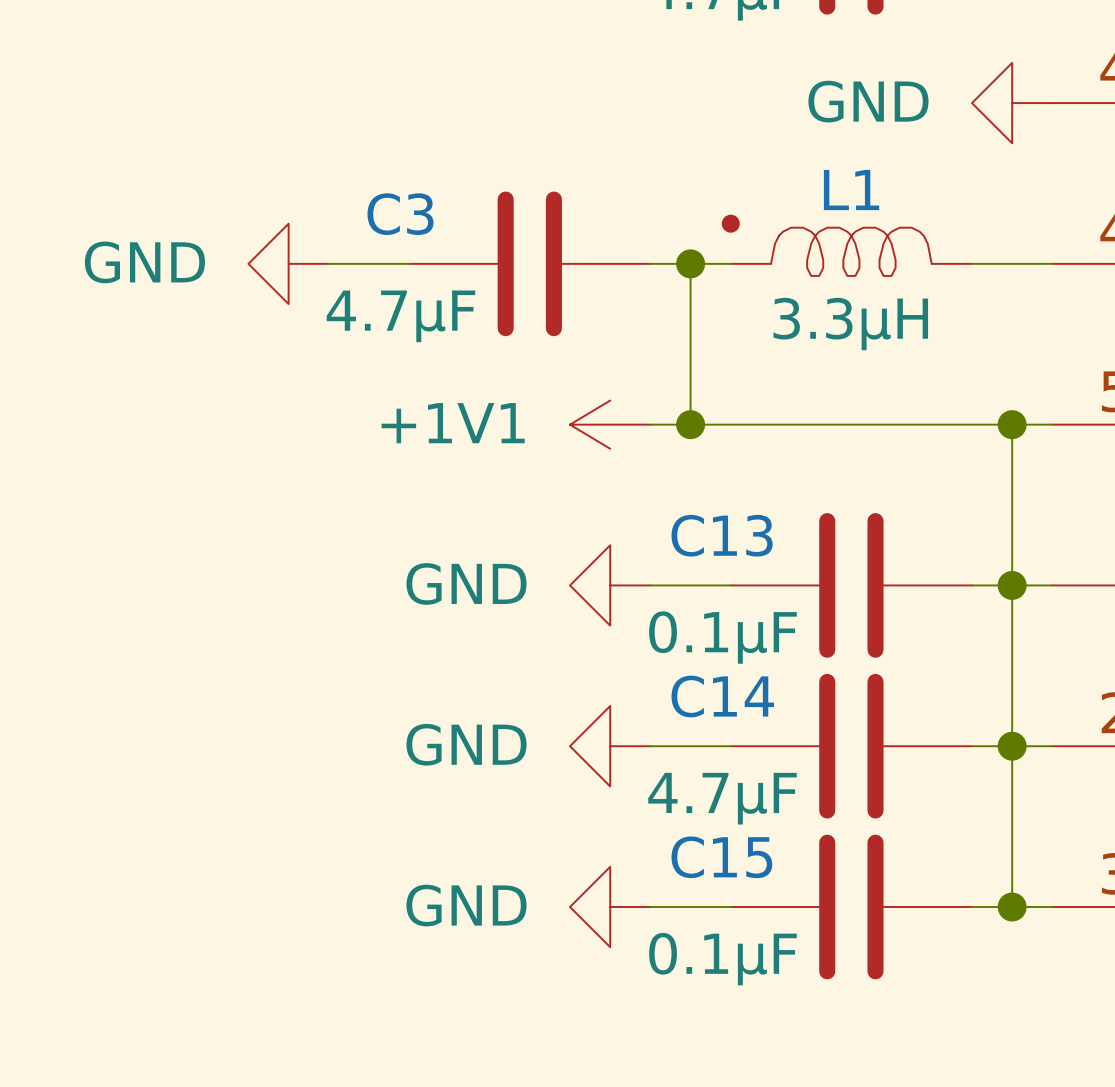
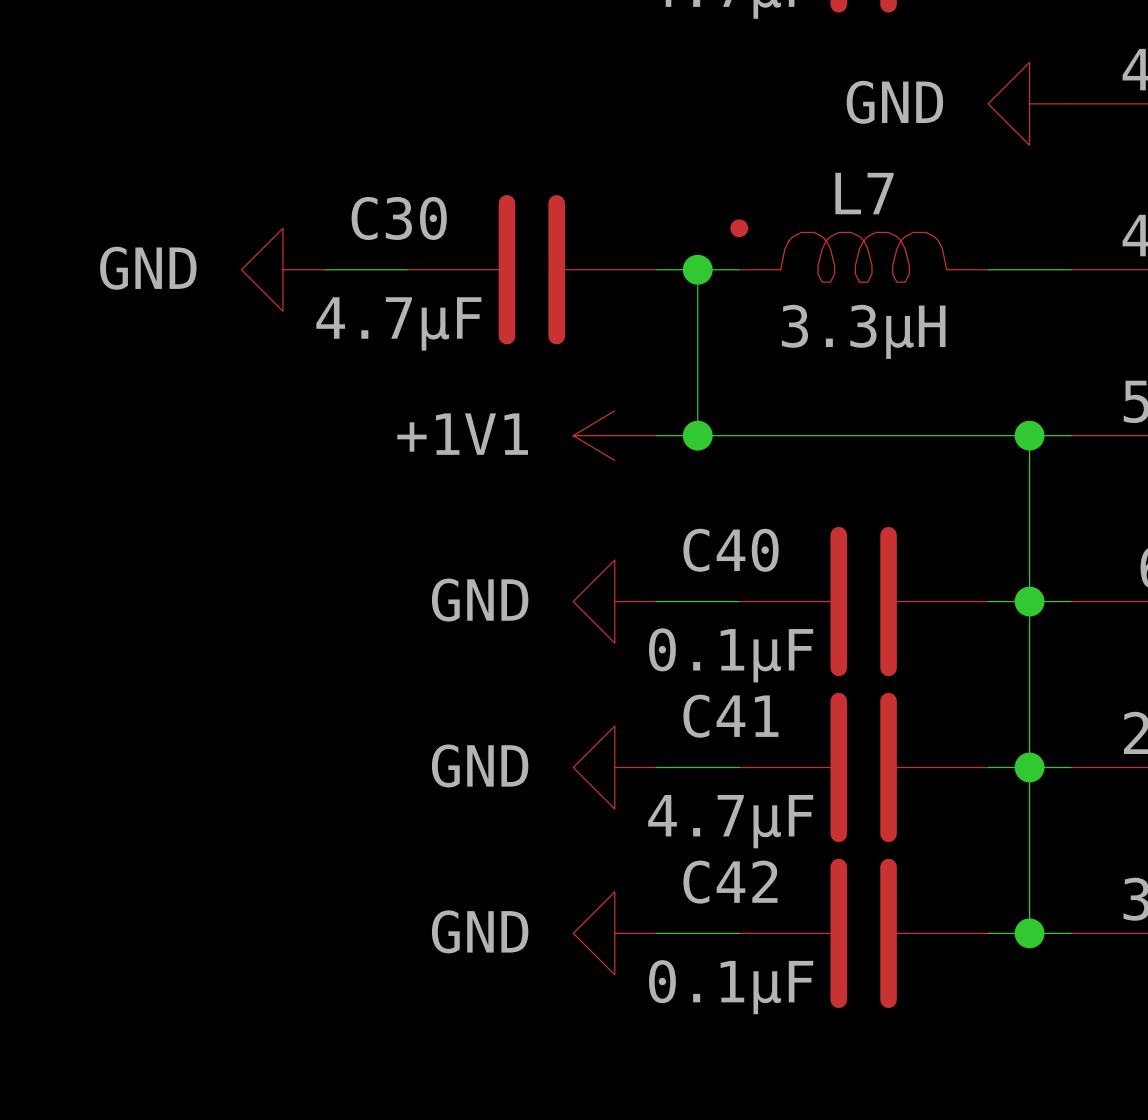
L1 name: L1 (851, 190) -> L7 (864, 193)
C3 name: C3 (400, 214) -> C30 (399, 218)
C13 name: C13 (722, 535) -> C40 (731, 550)
C14 name: C14 (722, 696) -> C41 (730, 716)
C15 name: C15 (721, 857) -> C42 (730, 882)

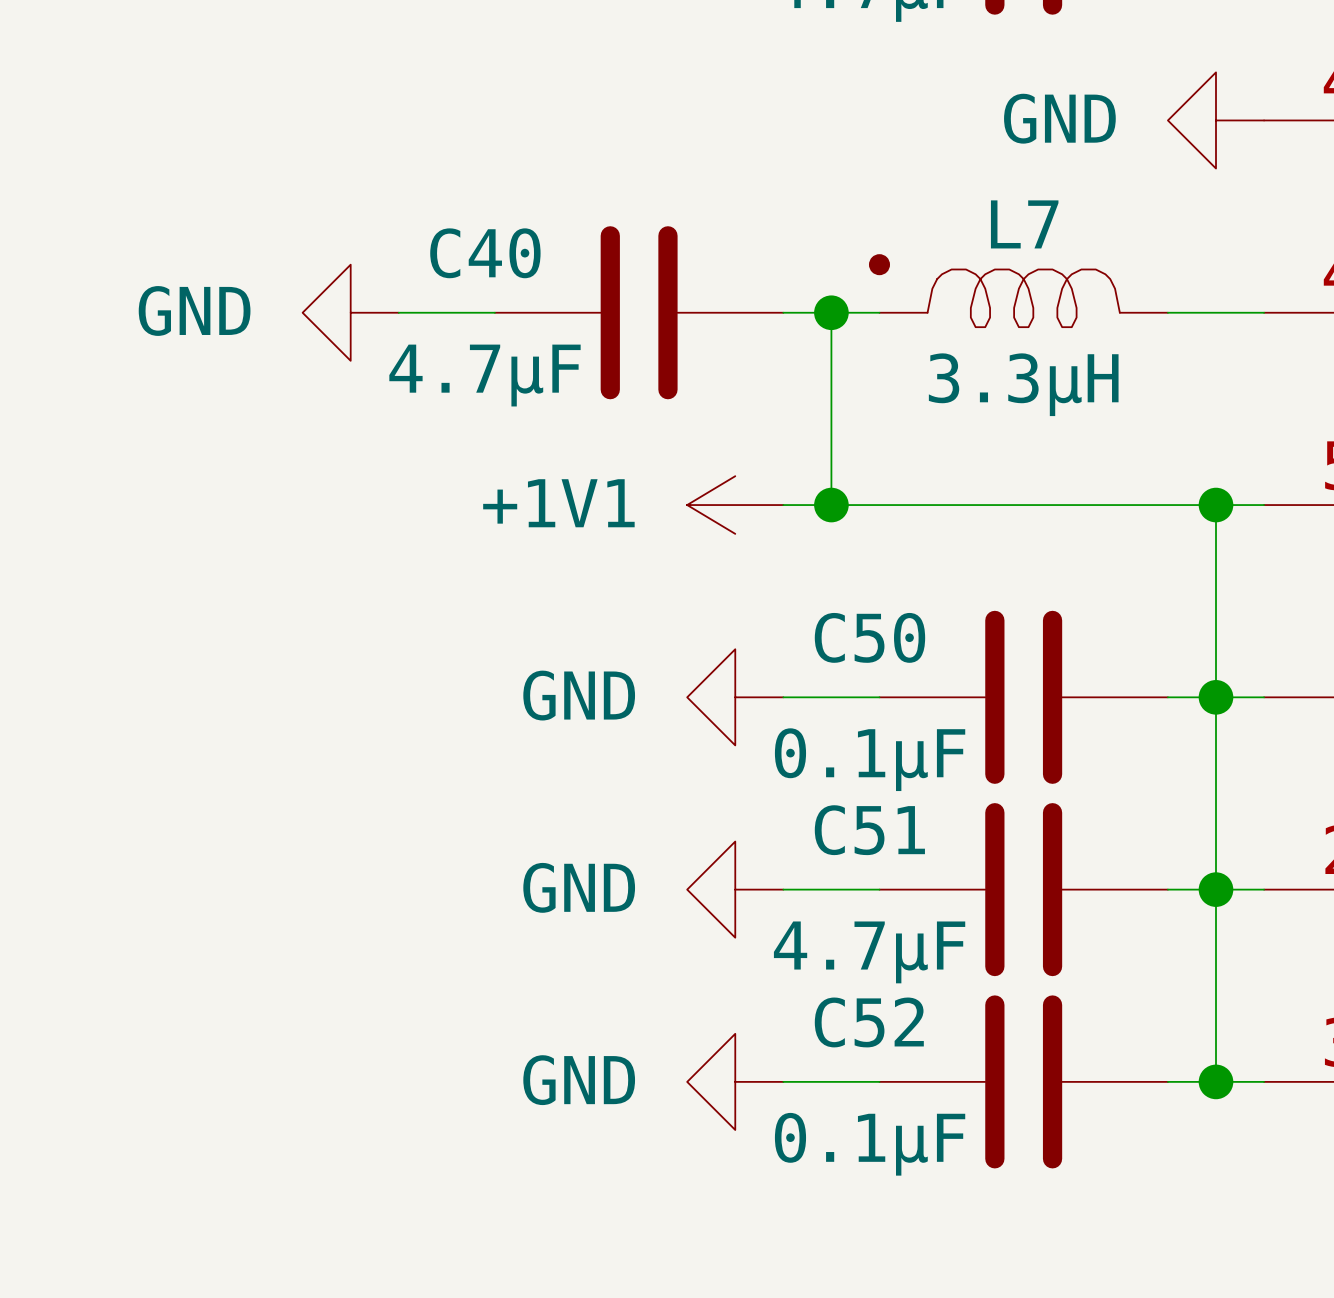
C30 name: C30 (399, 218) -> C40 (485, 253)
C40 name: C40 (731, 550) -> C50 (869, 637)
C41 name: C41 (730, 716) -> C51 (869, 830)
C42 name: C42 (730, 882) -> C52 (869, 1022)

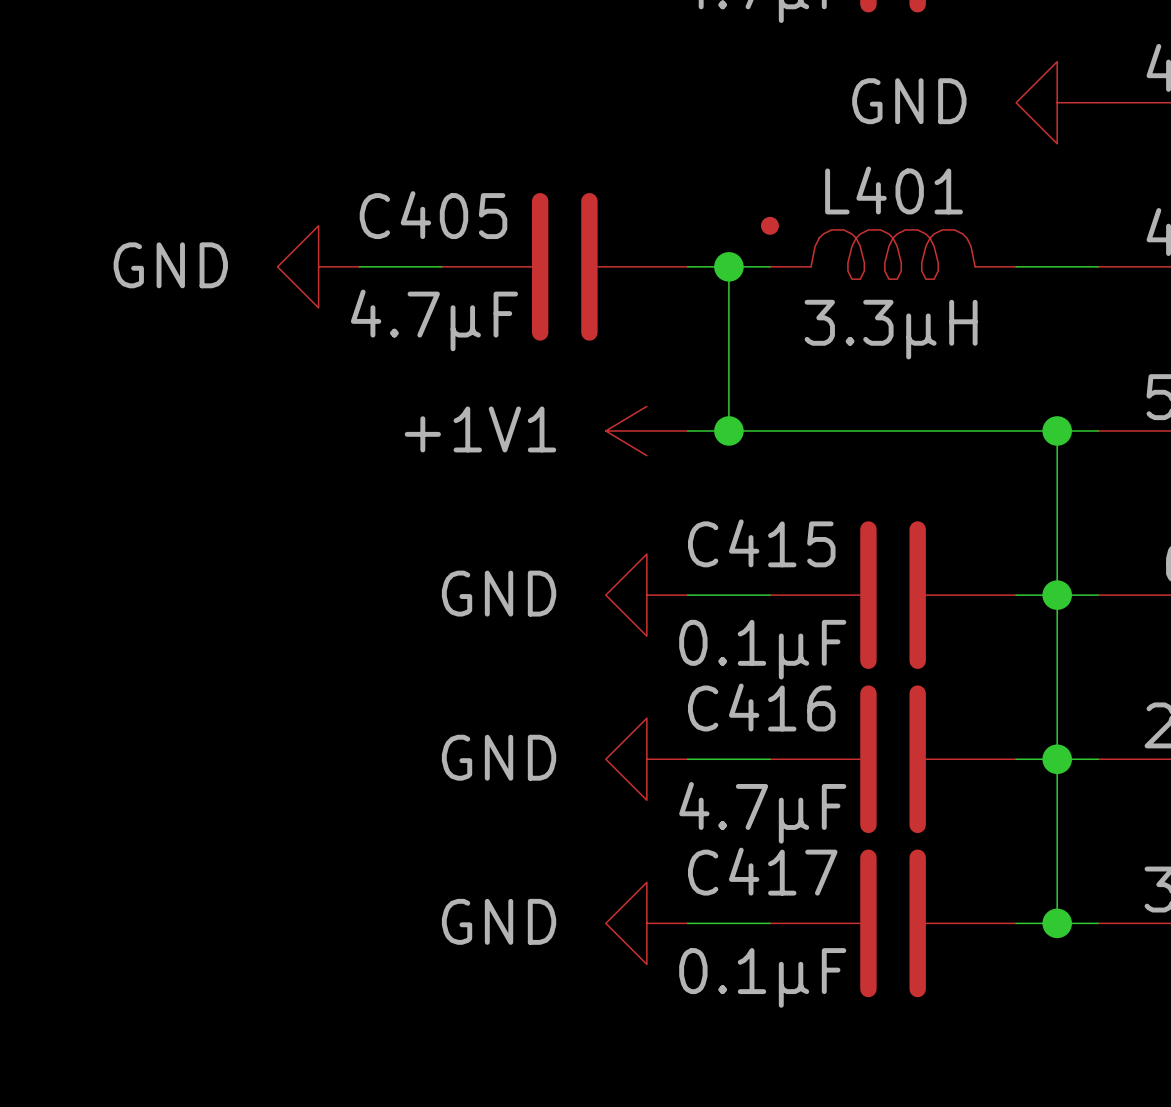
L7 name: L7 (1024, 224) -> L401 (894, 190)
C40 name: C40 (485, 253) -> C405 (433, 215)
C50 name: C50 (869, 637) -> C415 (761, 543)
C51 name: C51 (869, 830) -> C416 (761, 707)
C52 name: C52 (869, 1022) -> C417 (762, 871)

